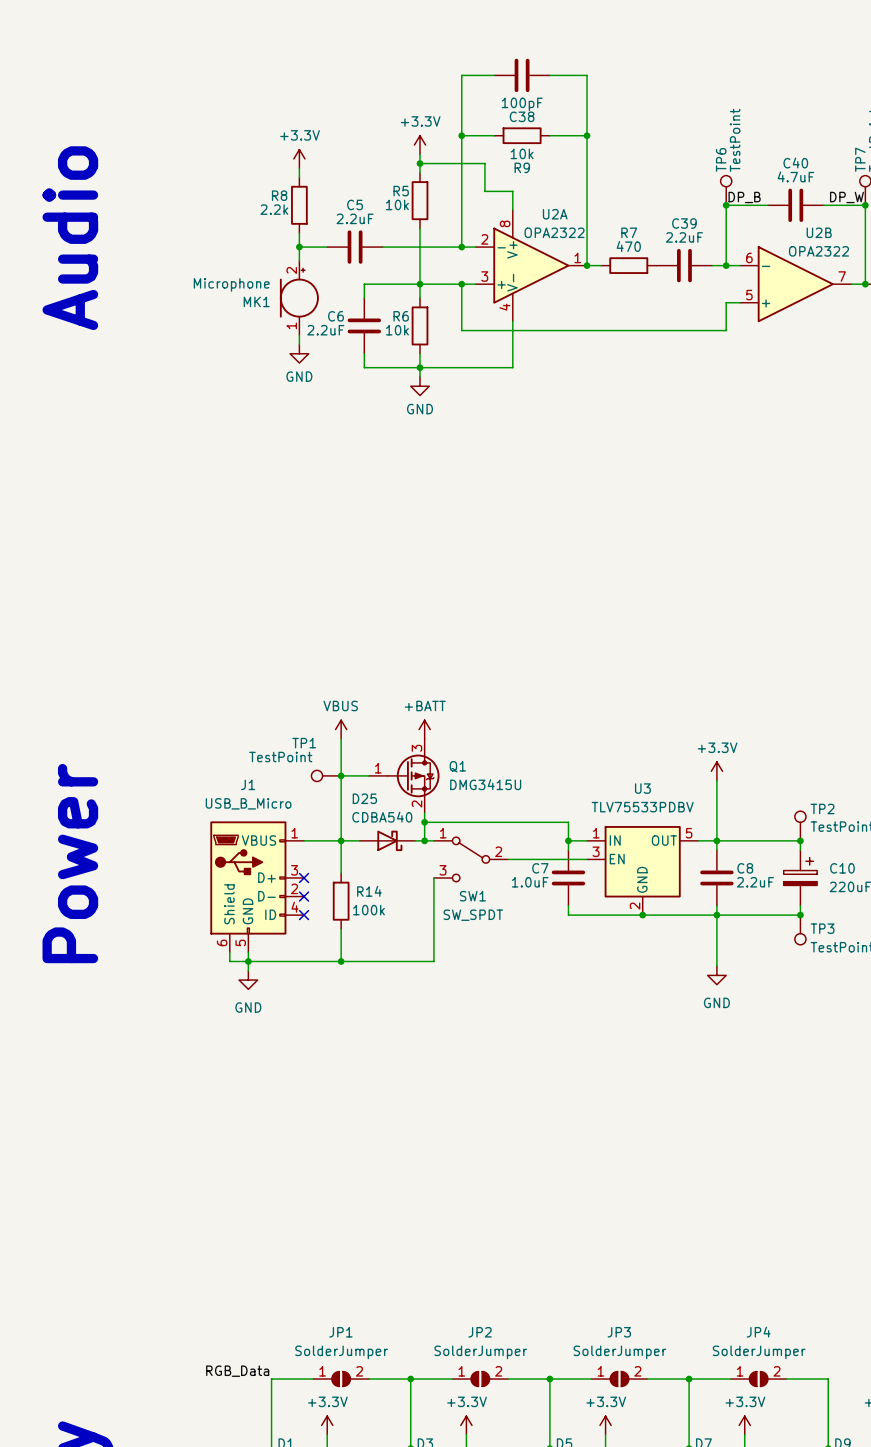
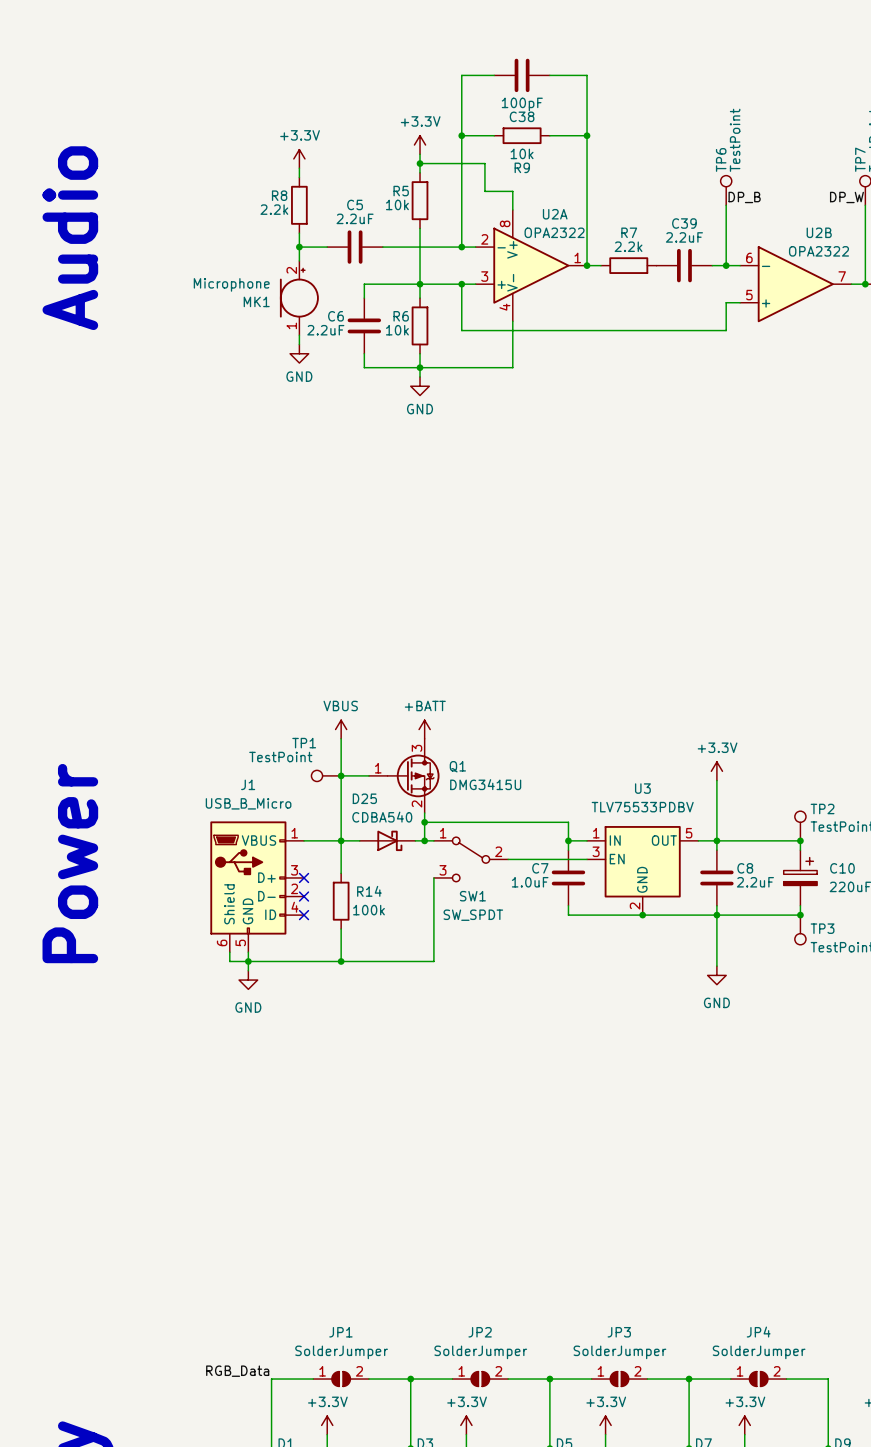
wire: (726, 205) (767, 205) -> none
junction: (726, 205) -> none
C40: 4.7uF (795, 205) -> none
wire: (823, 205) (865, 205) -> none
junction: (865, 205) -> none
R7 value: 470 (628, 246) -> 2.2k (628, 246)

